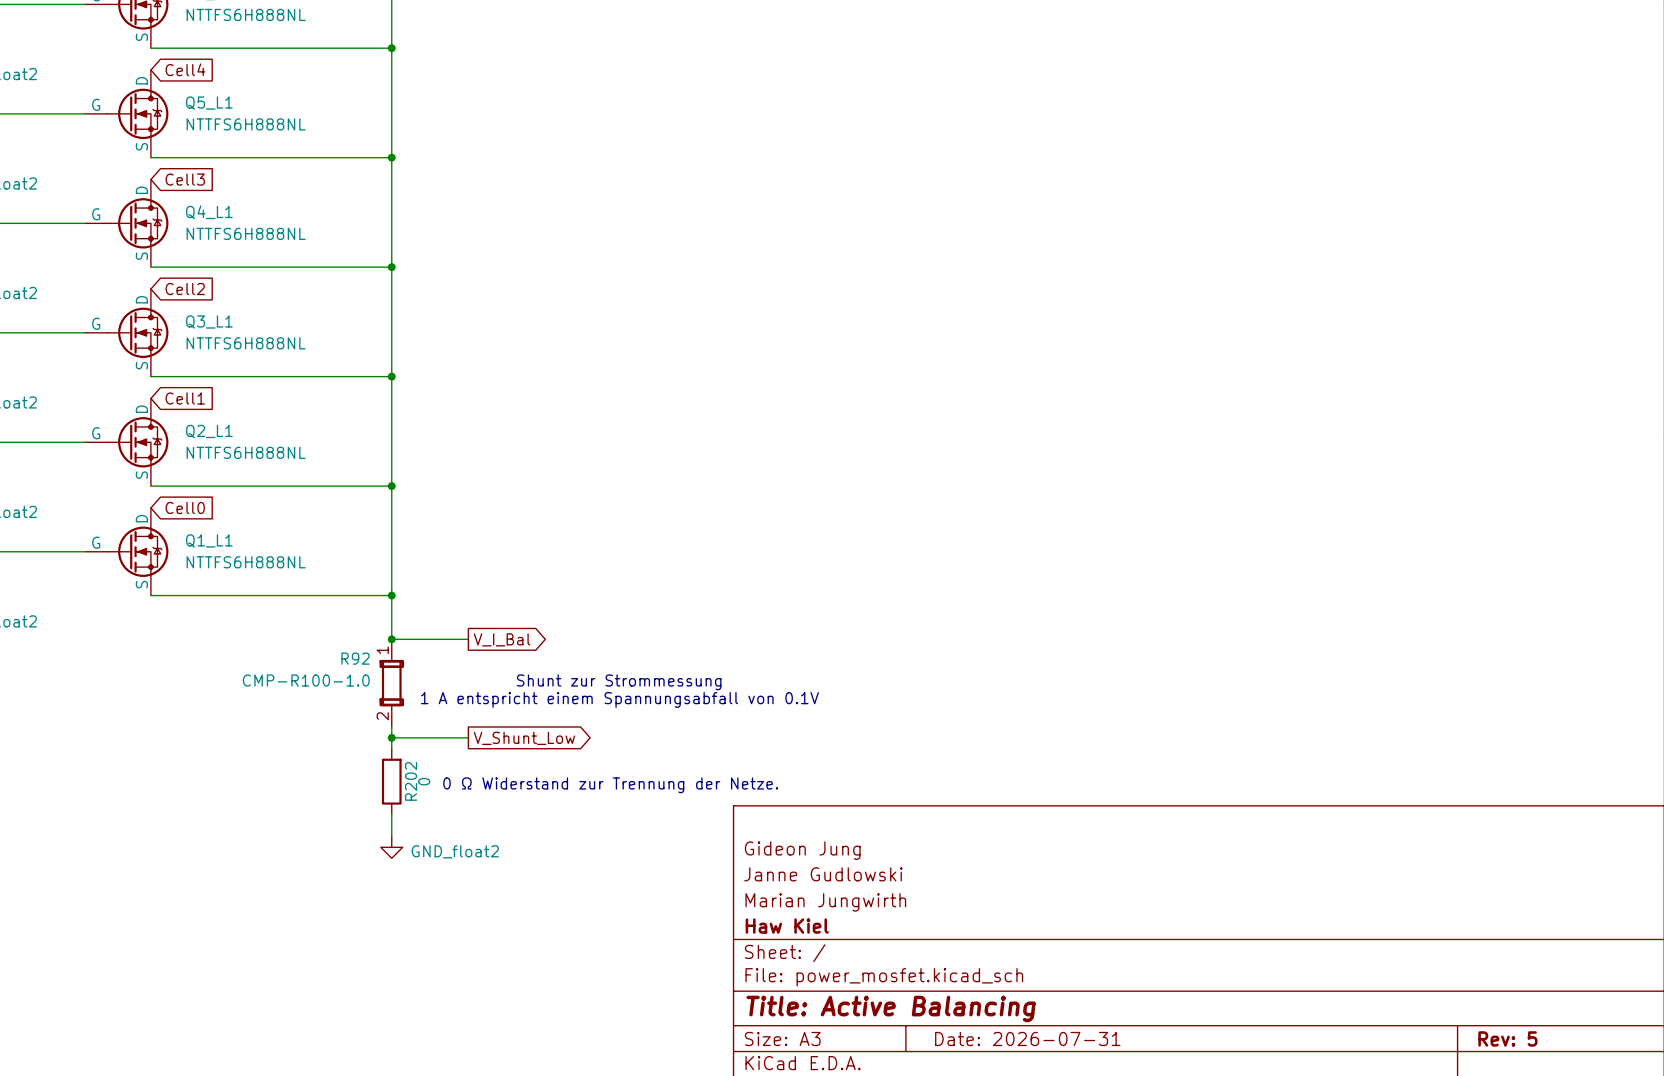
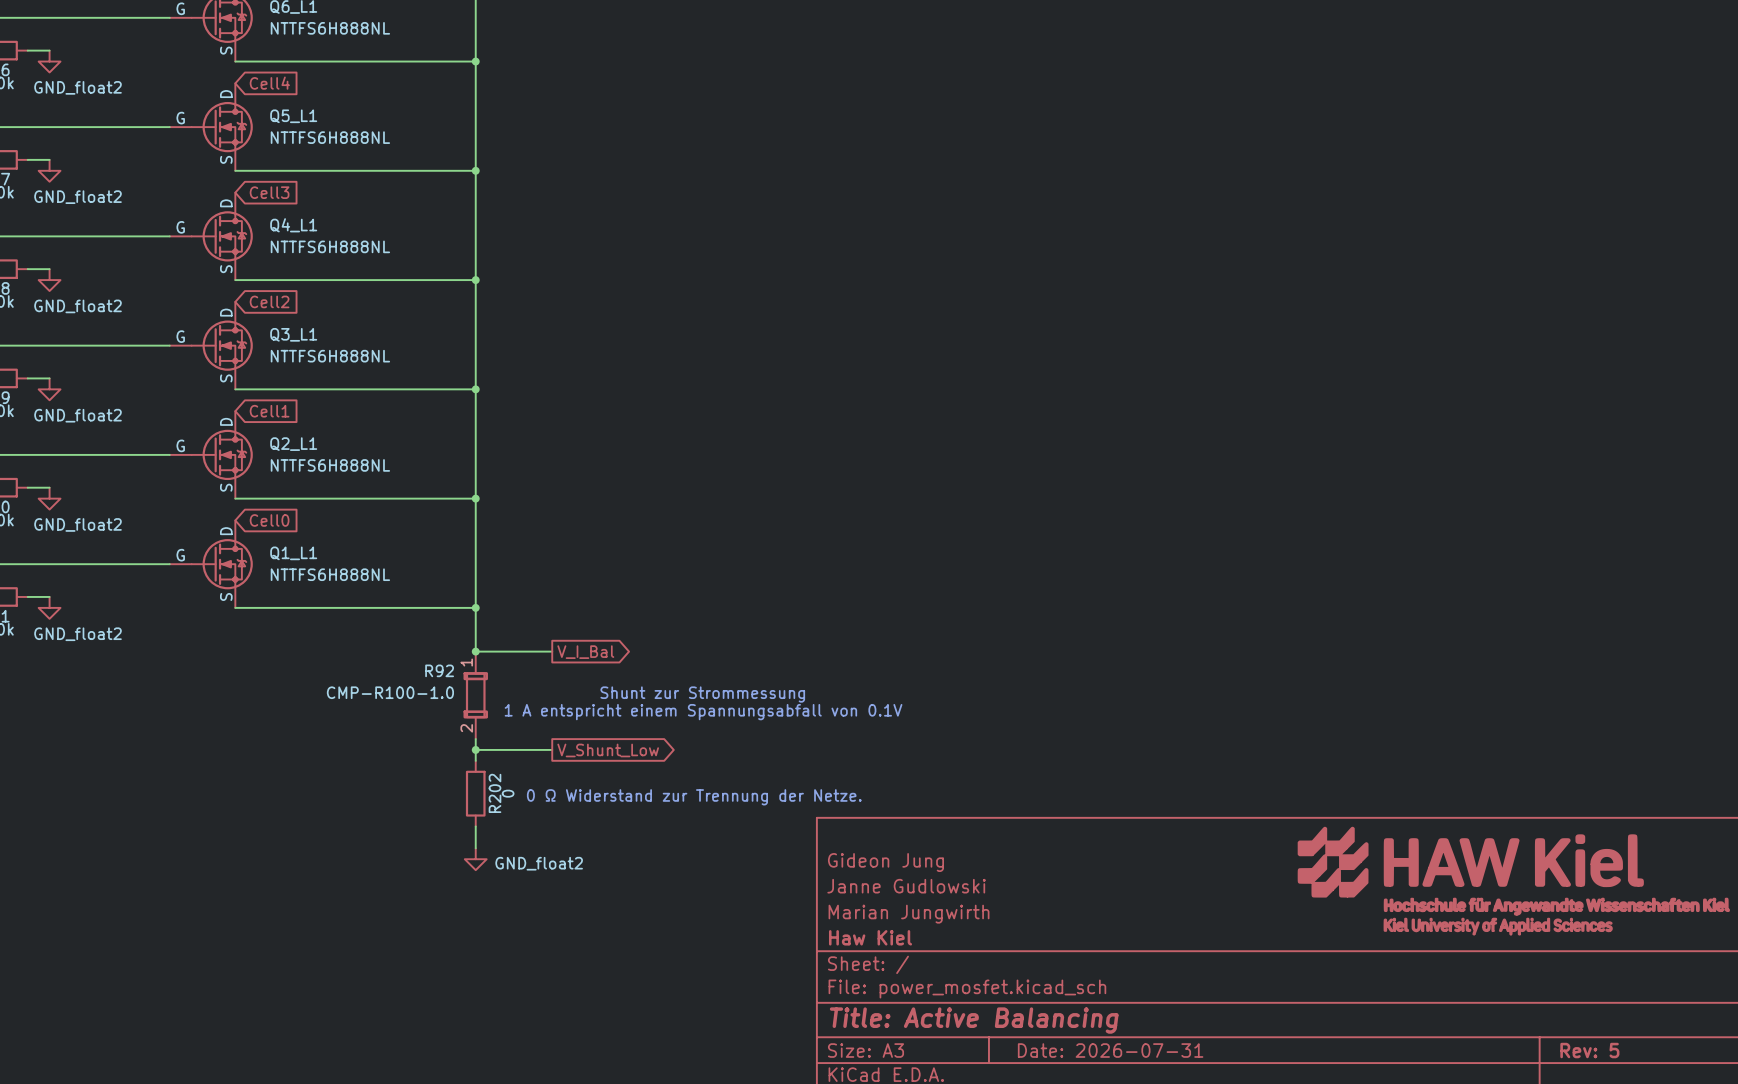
power symbol: none -> (1513, 881)

